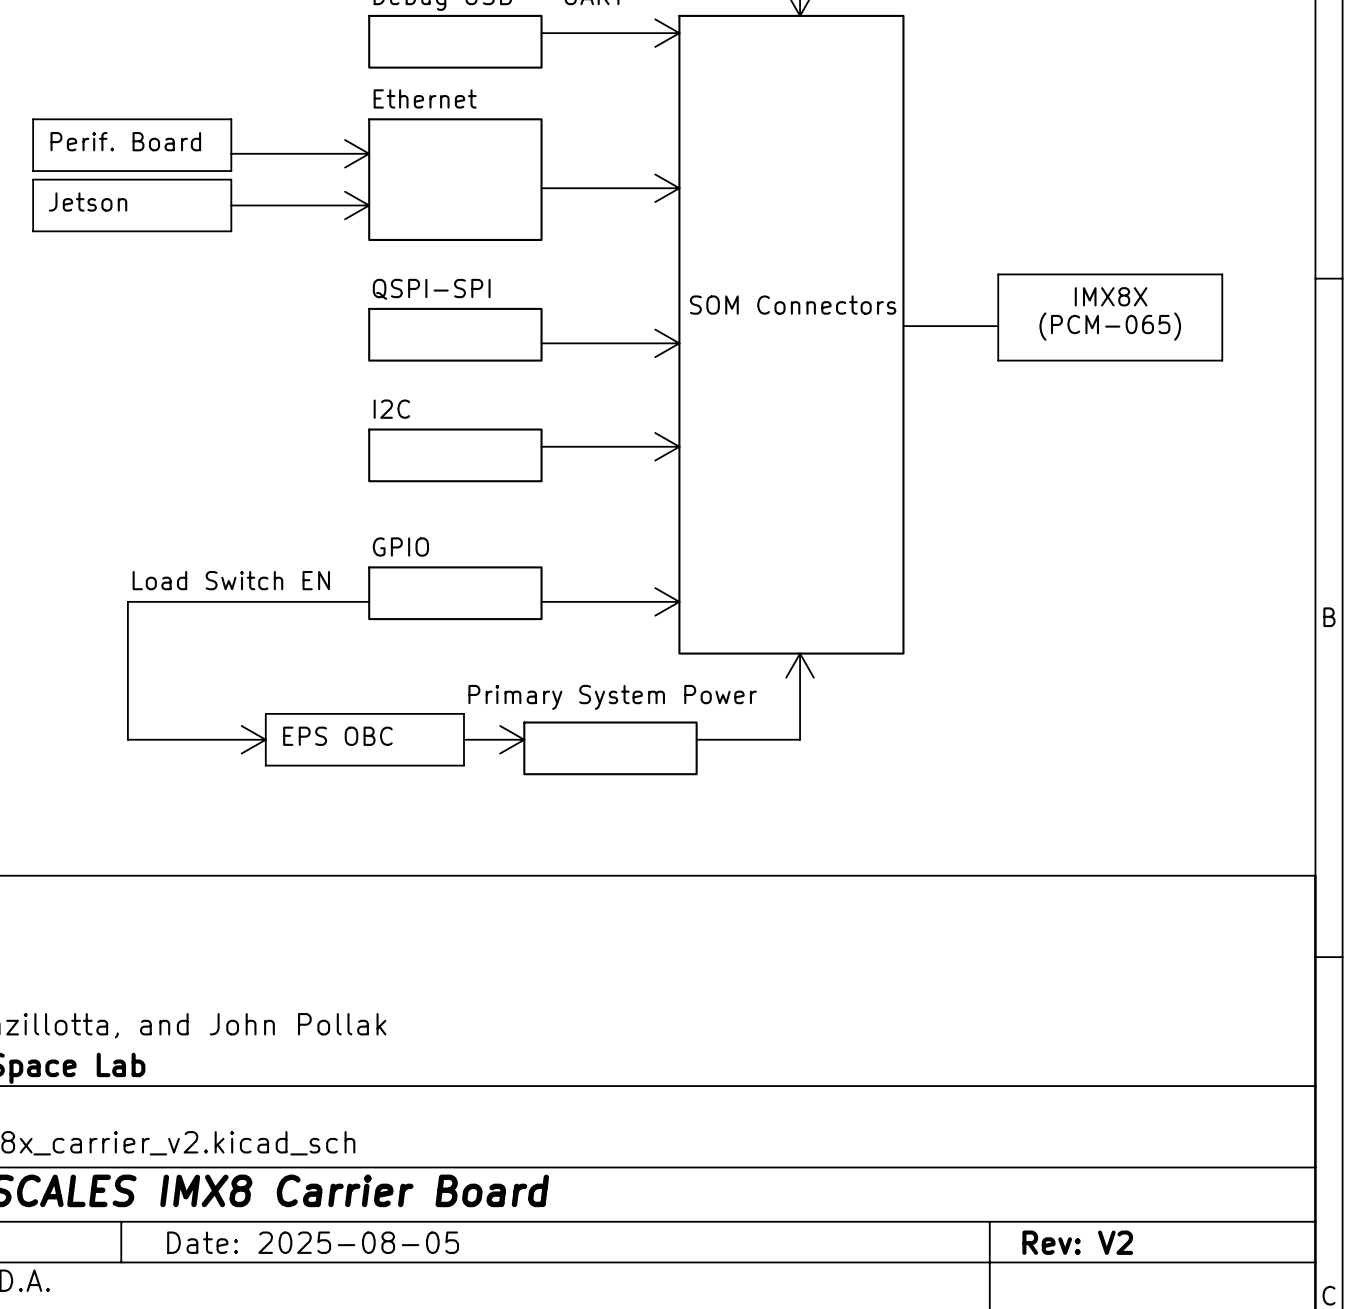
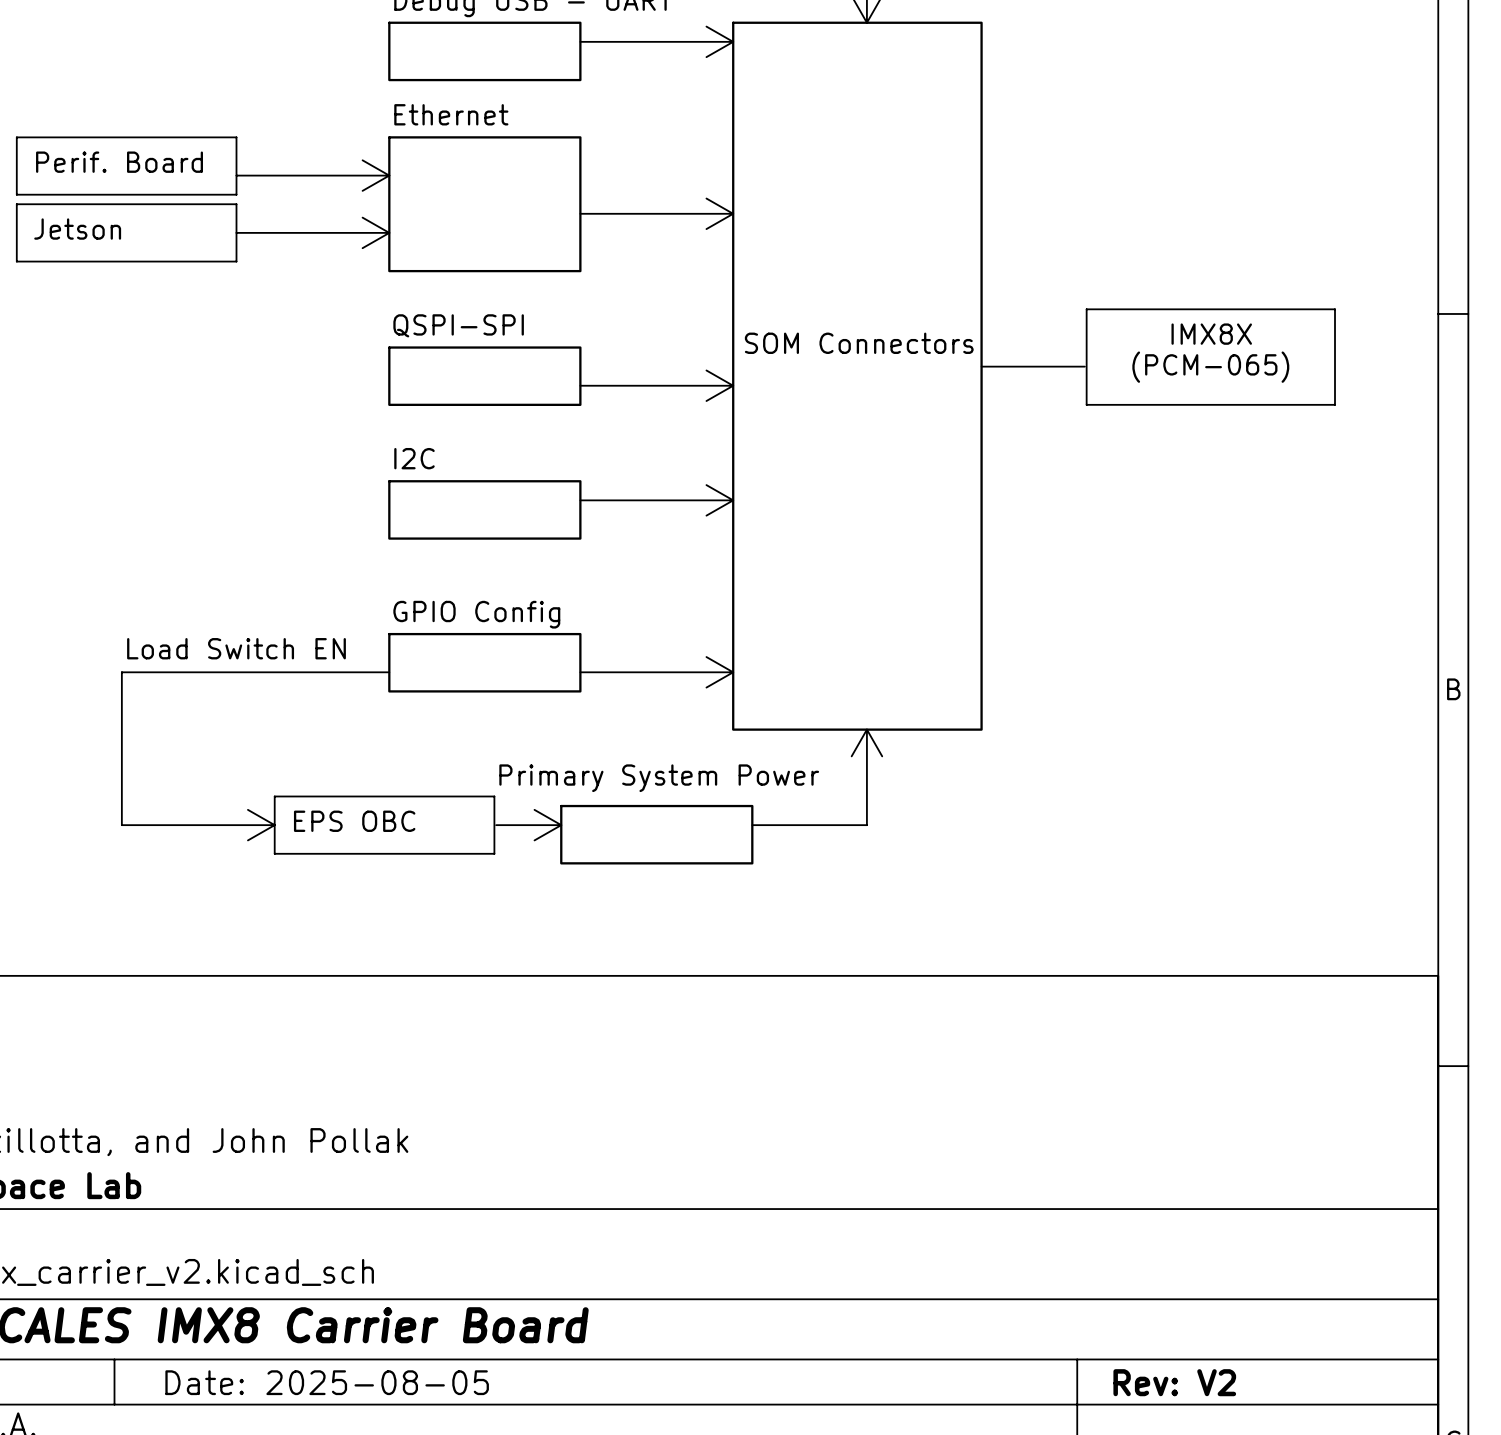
sheet GPIO name: GPIO (400, 547) -> GPIO Config (476, 614)

